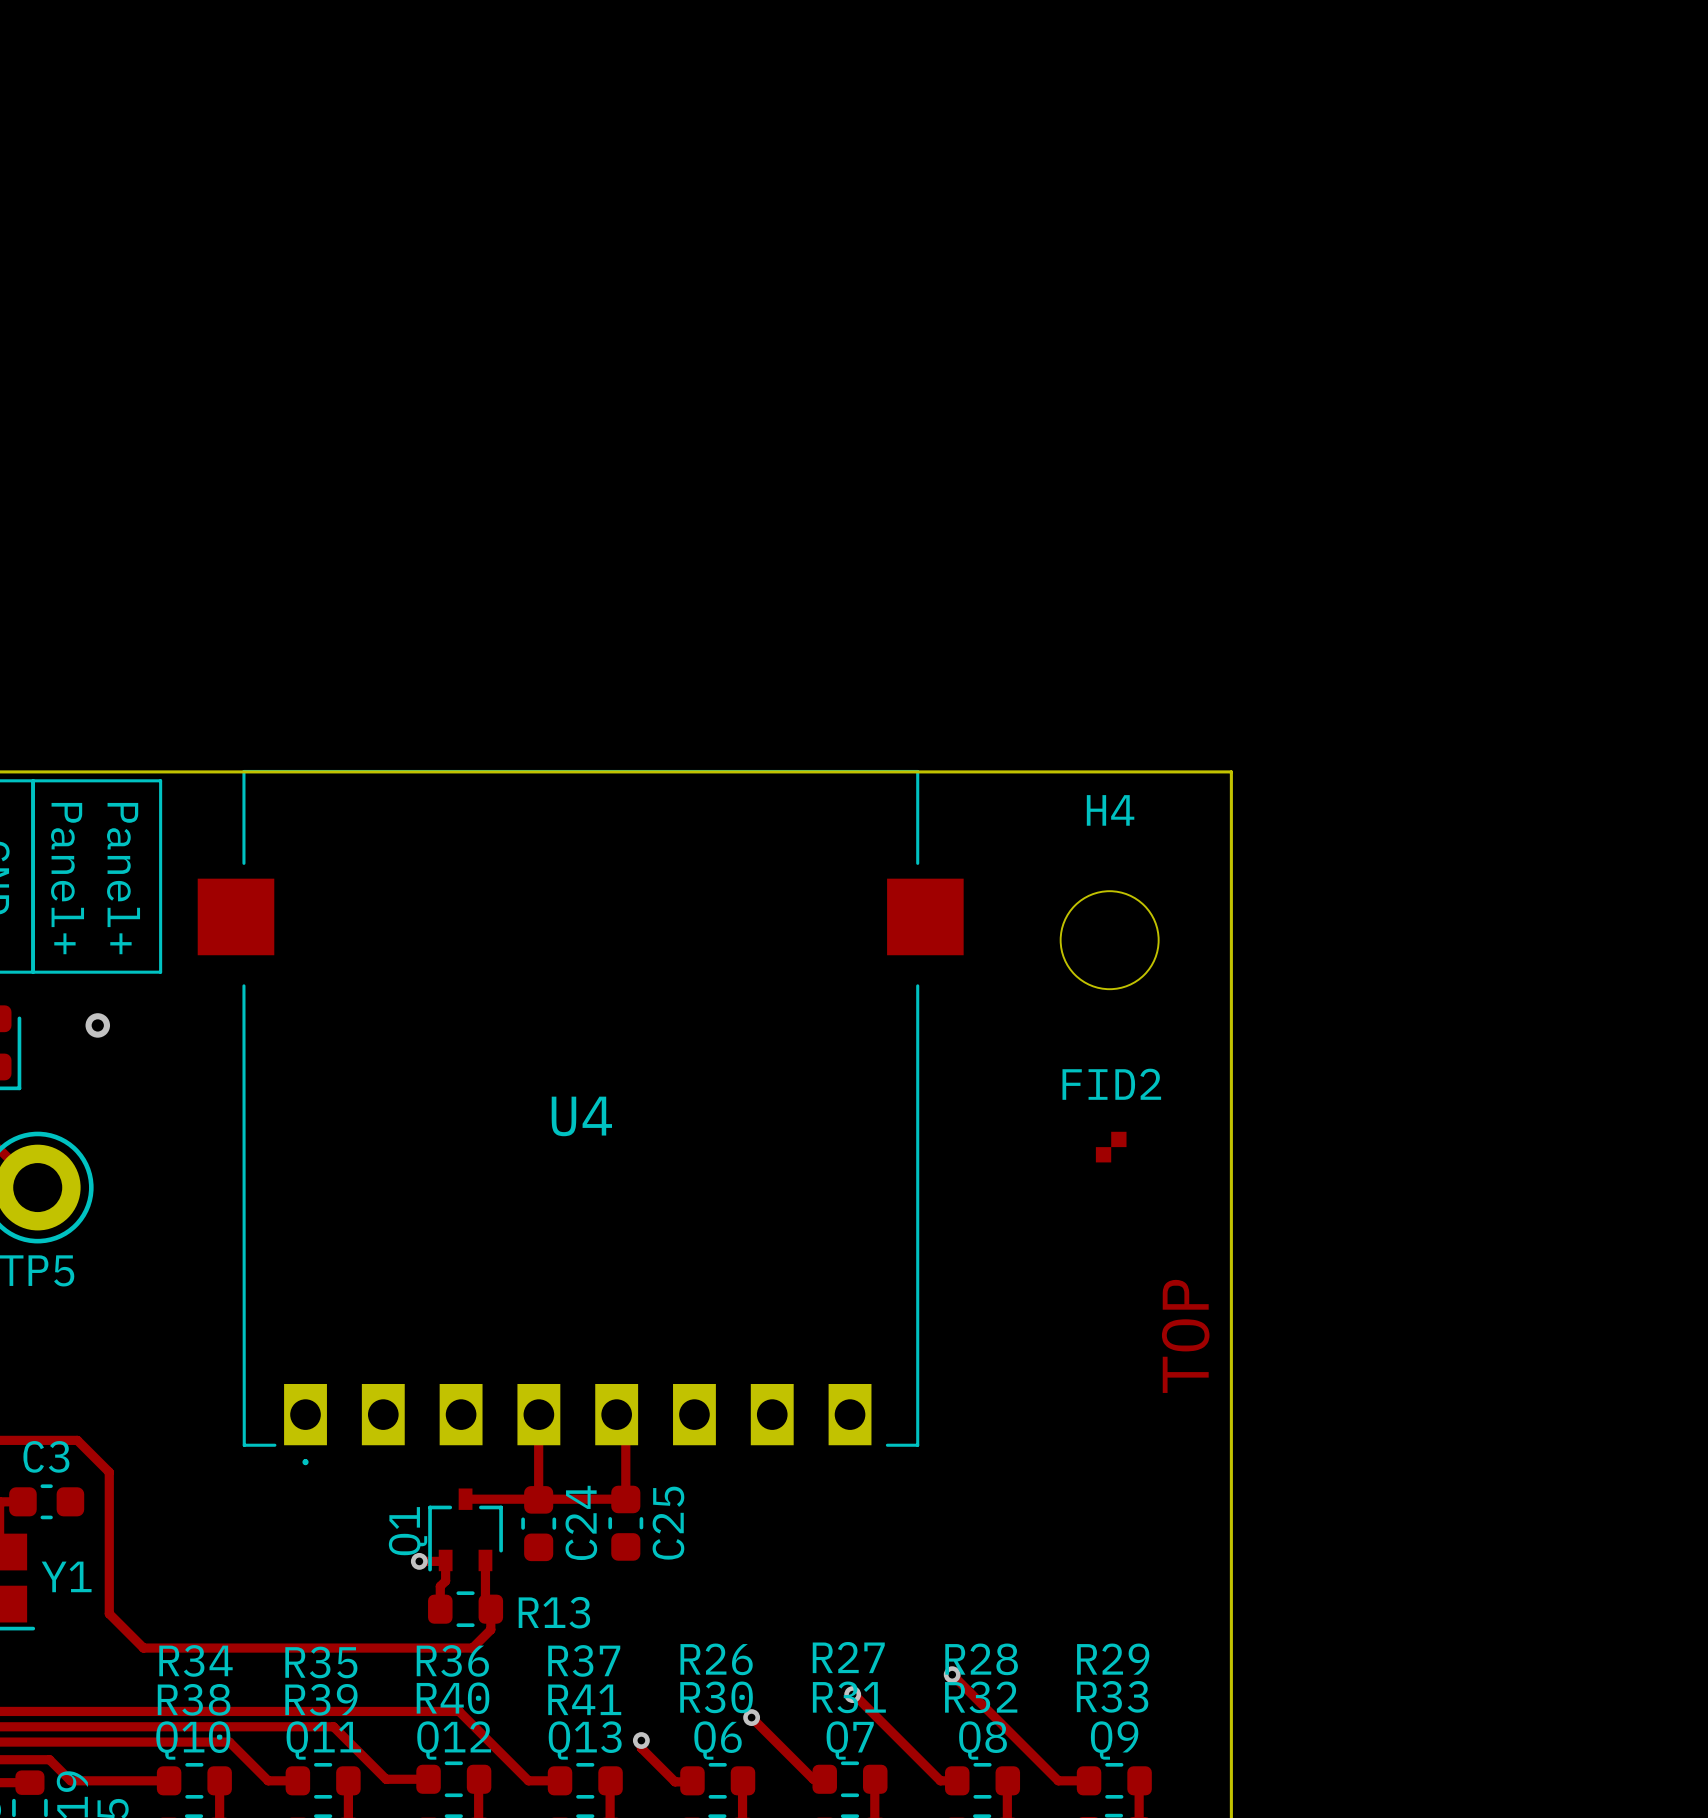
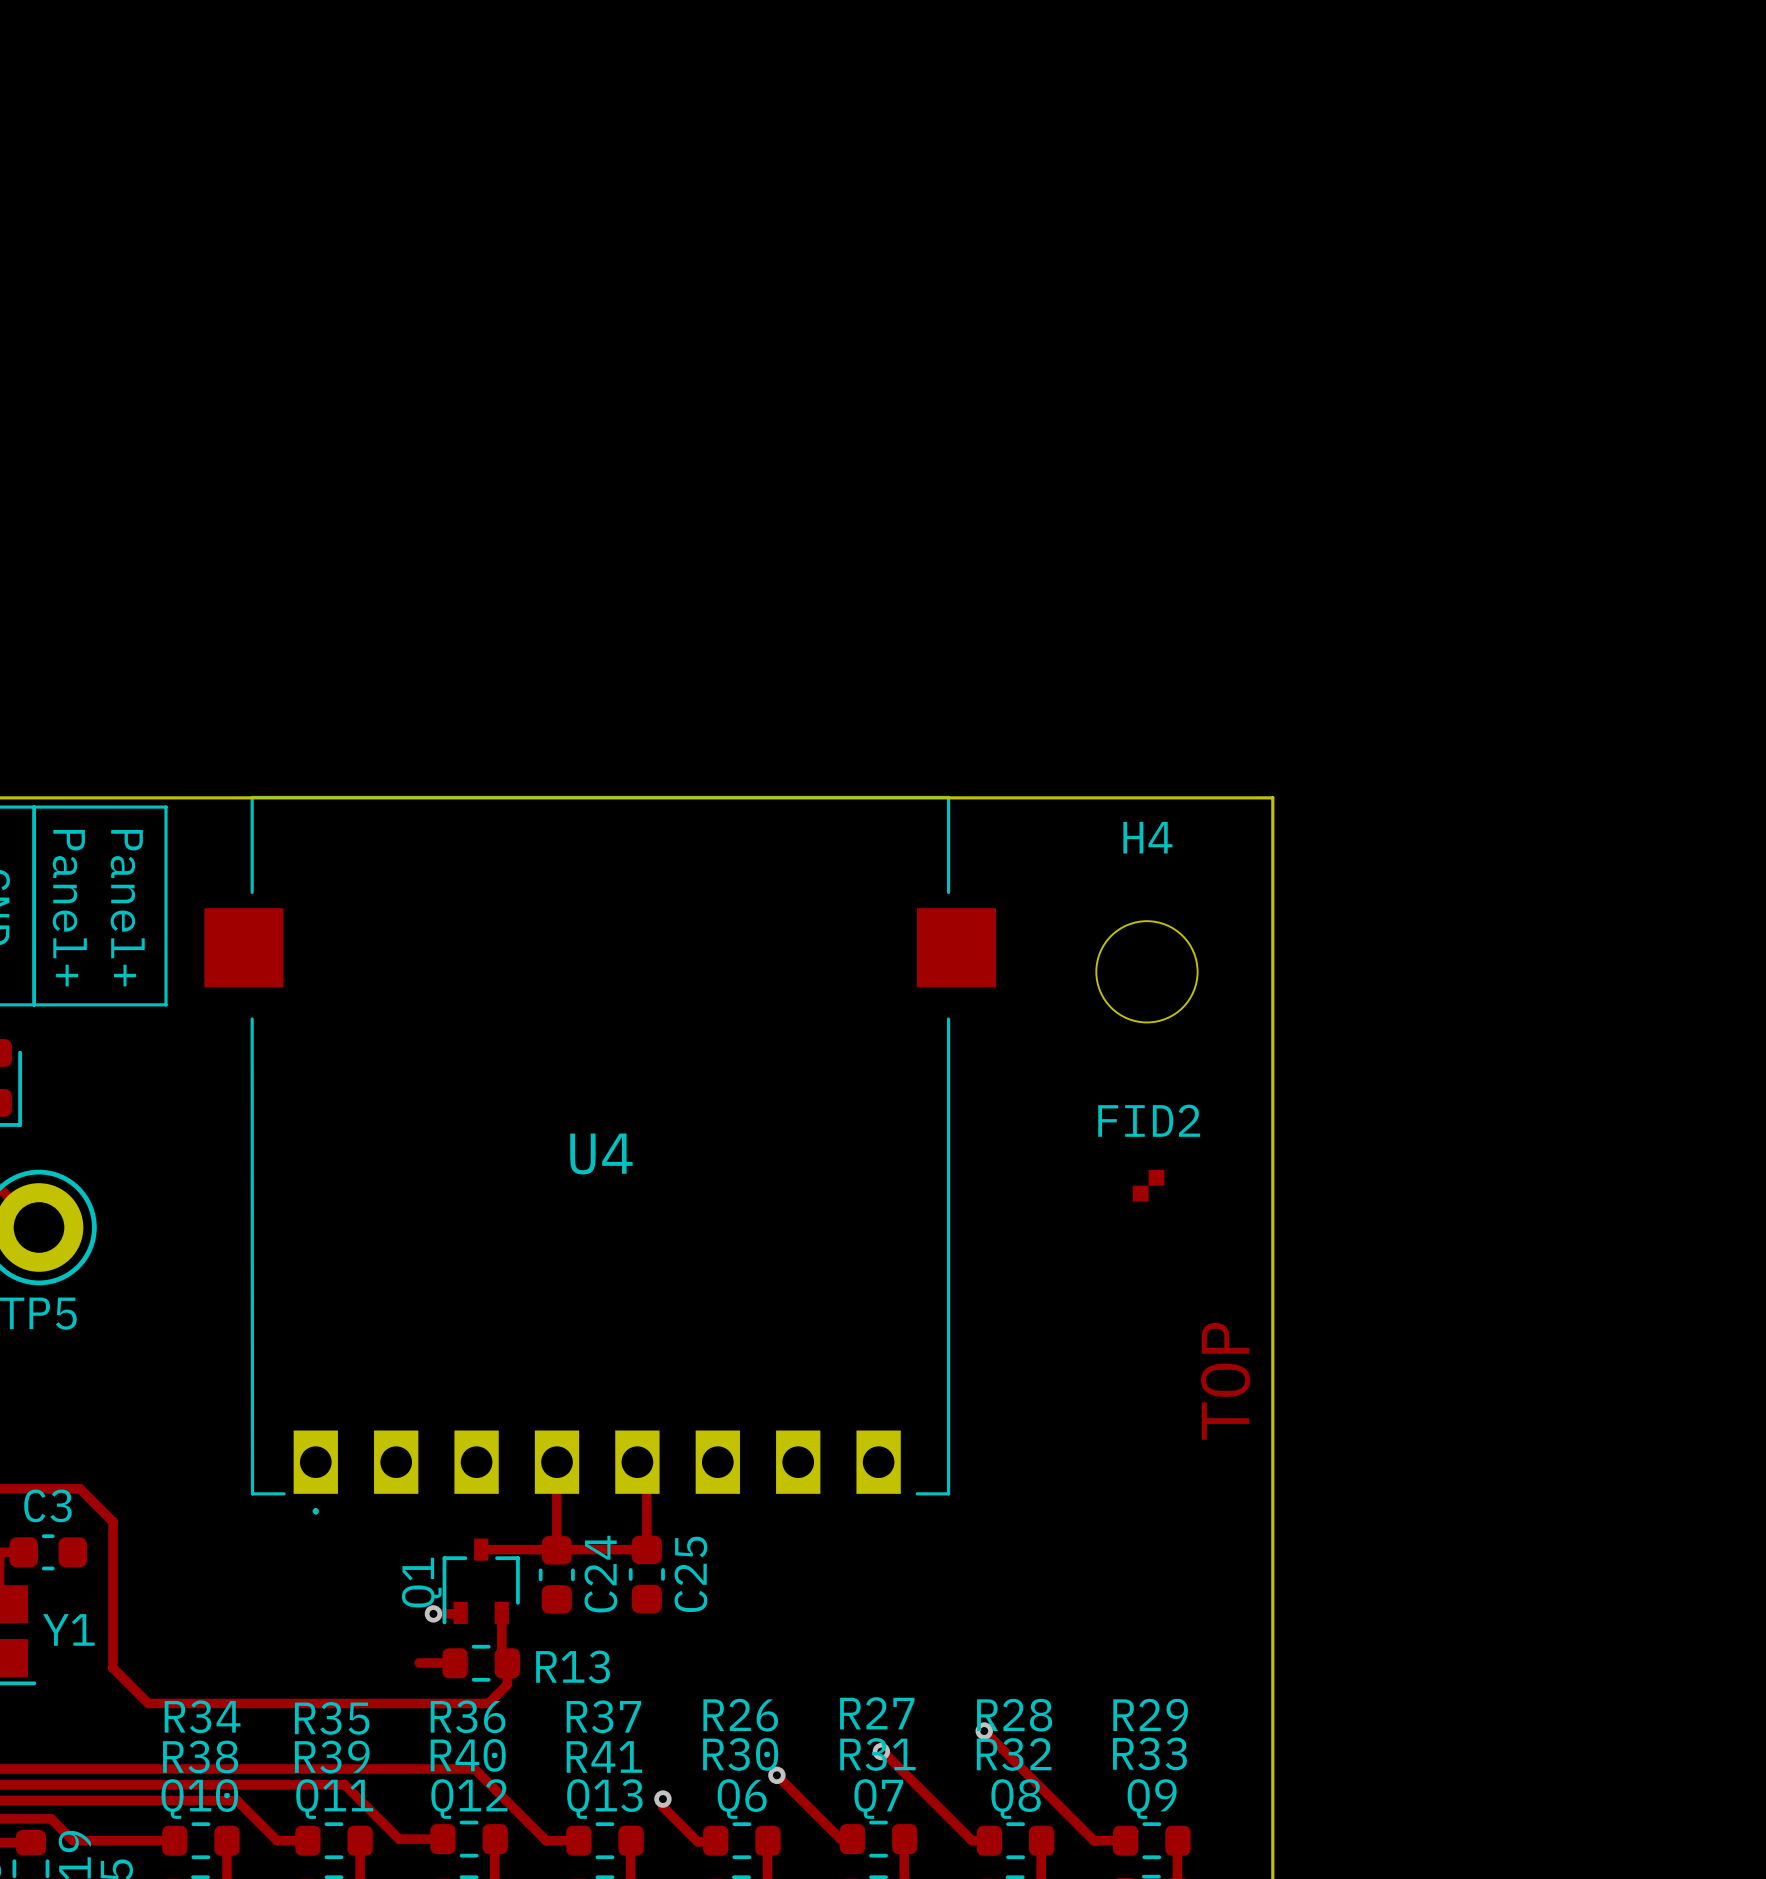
via: (97, 1025) -> none
track: (445, 1560) (445, 1581) (440, 1586) (440, 1609) -> (419, 1662) (454, 1662)

